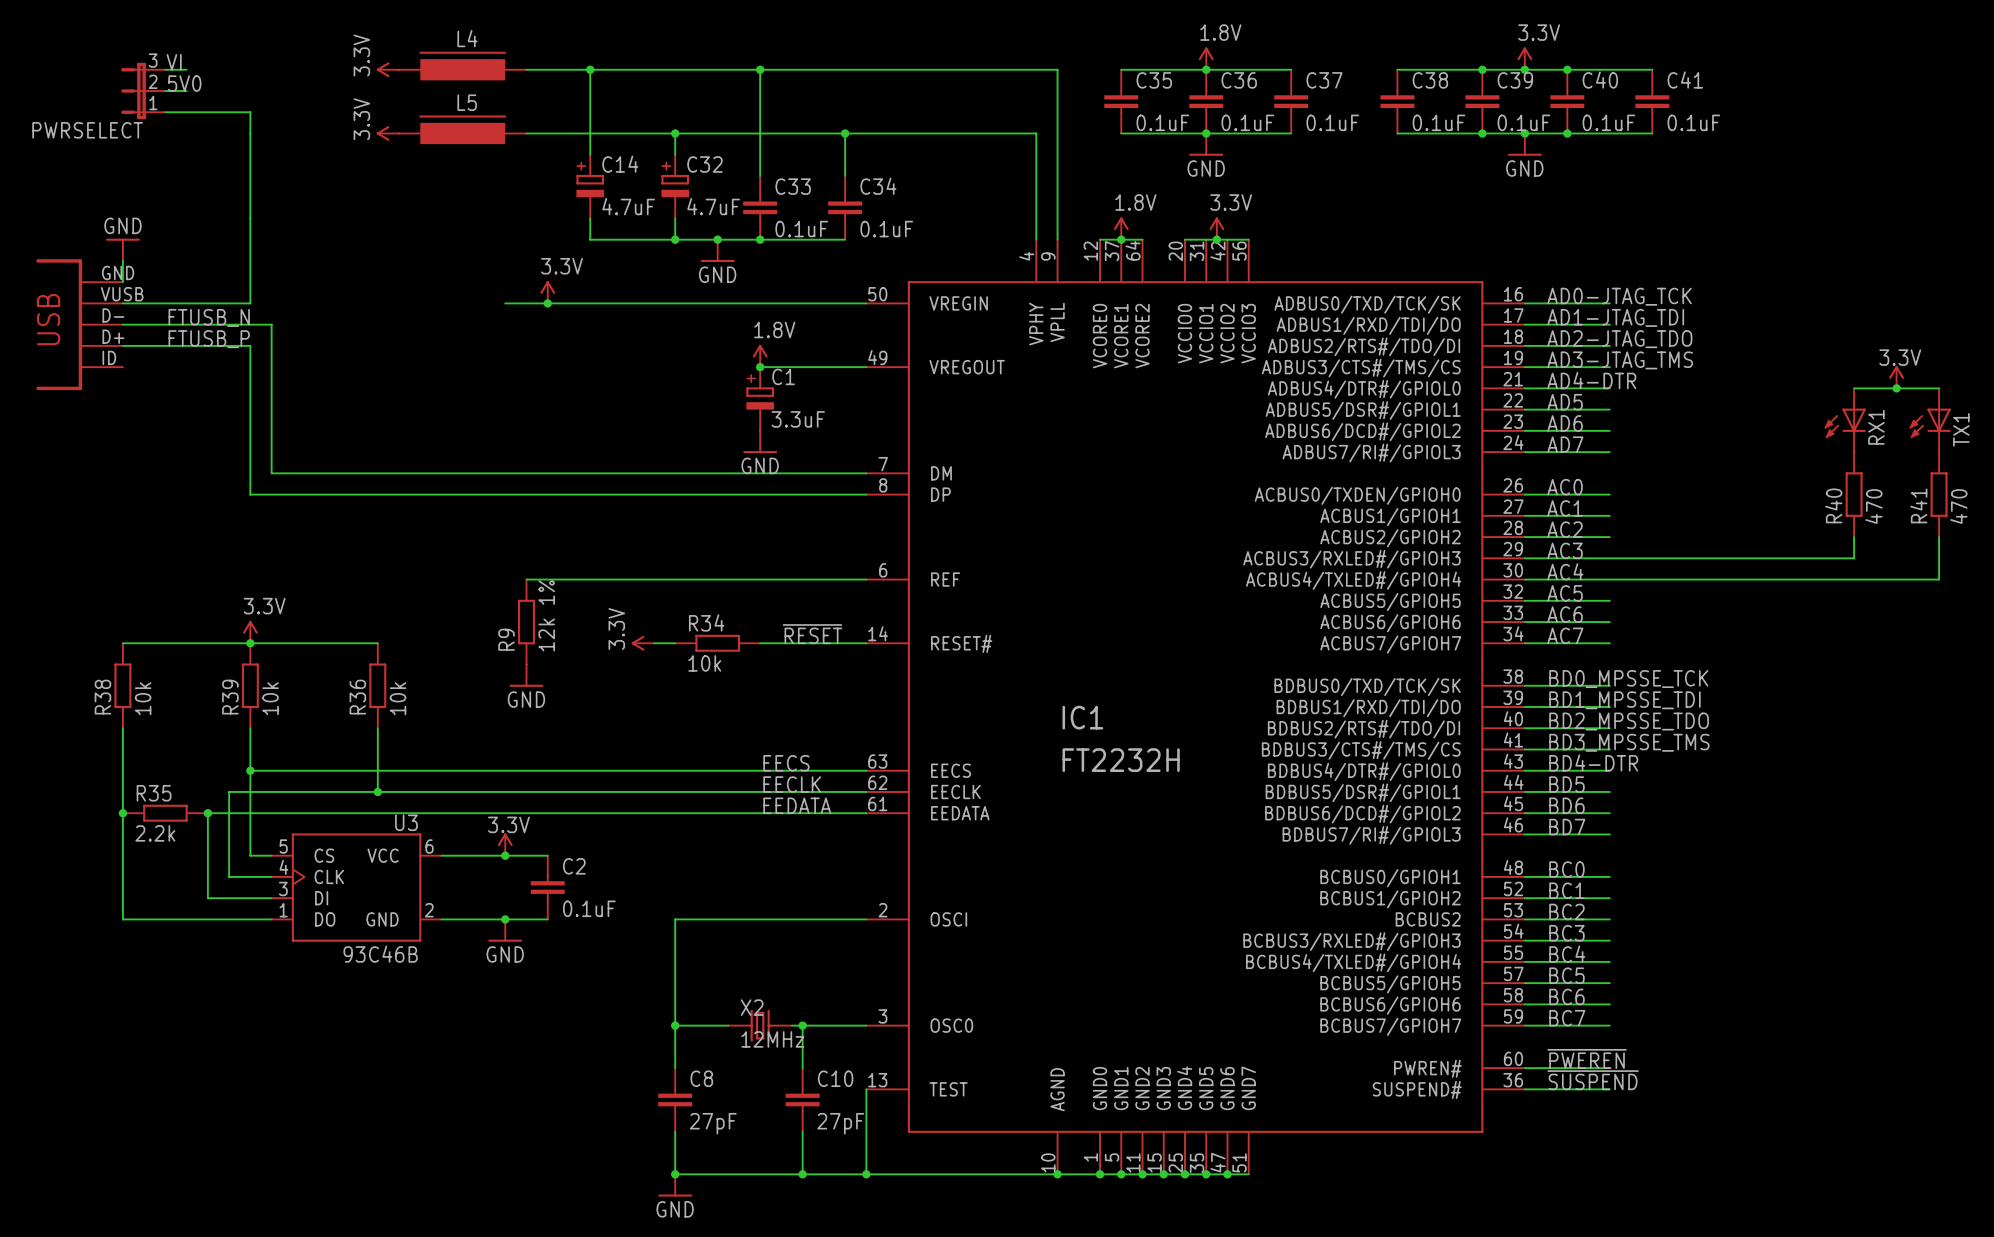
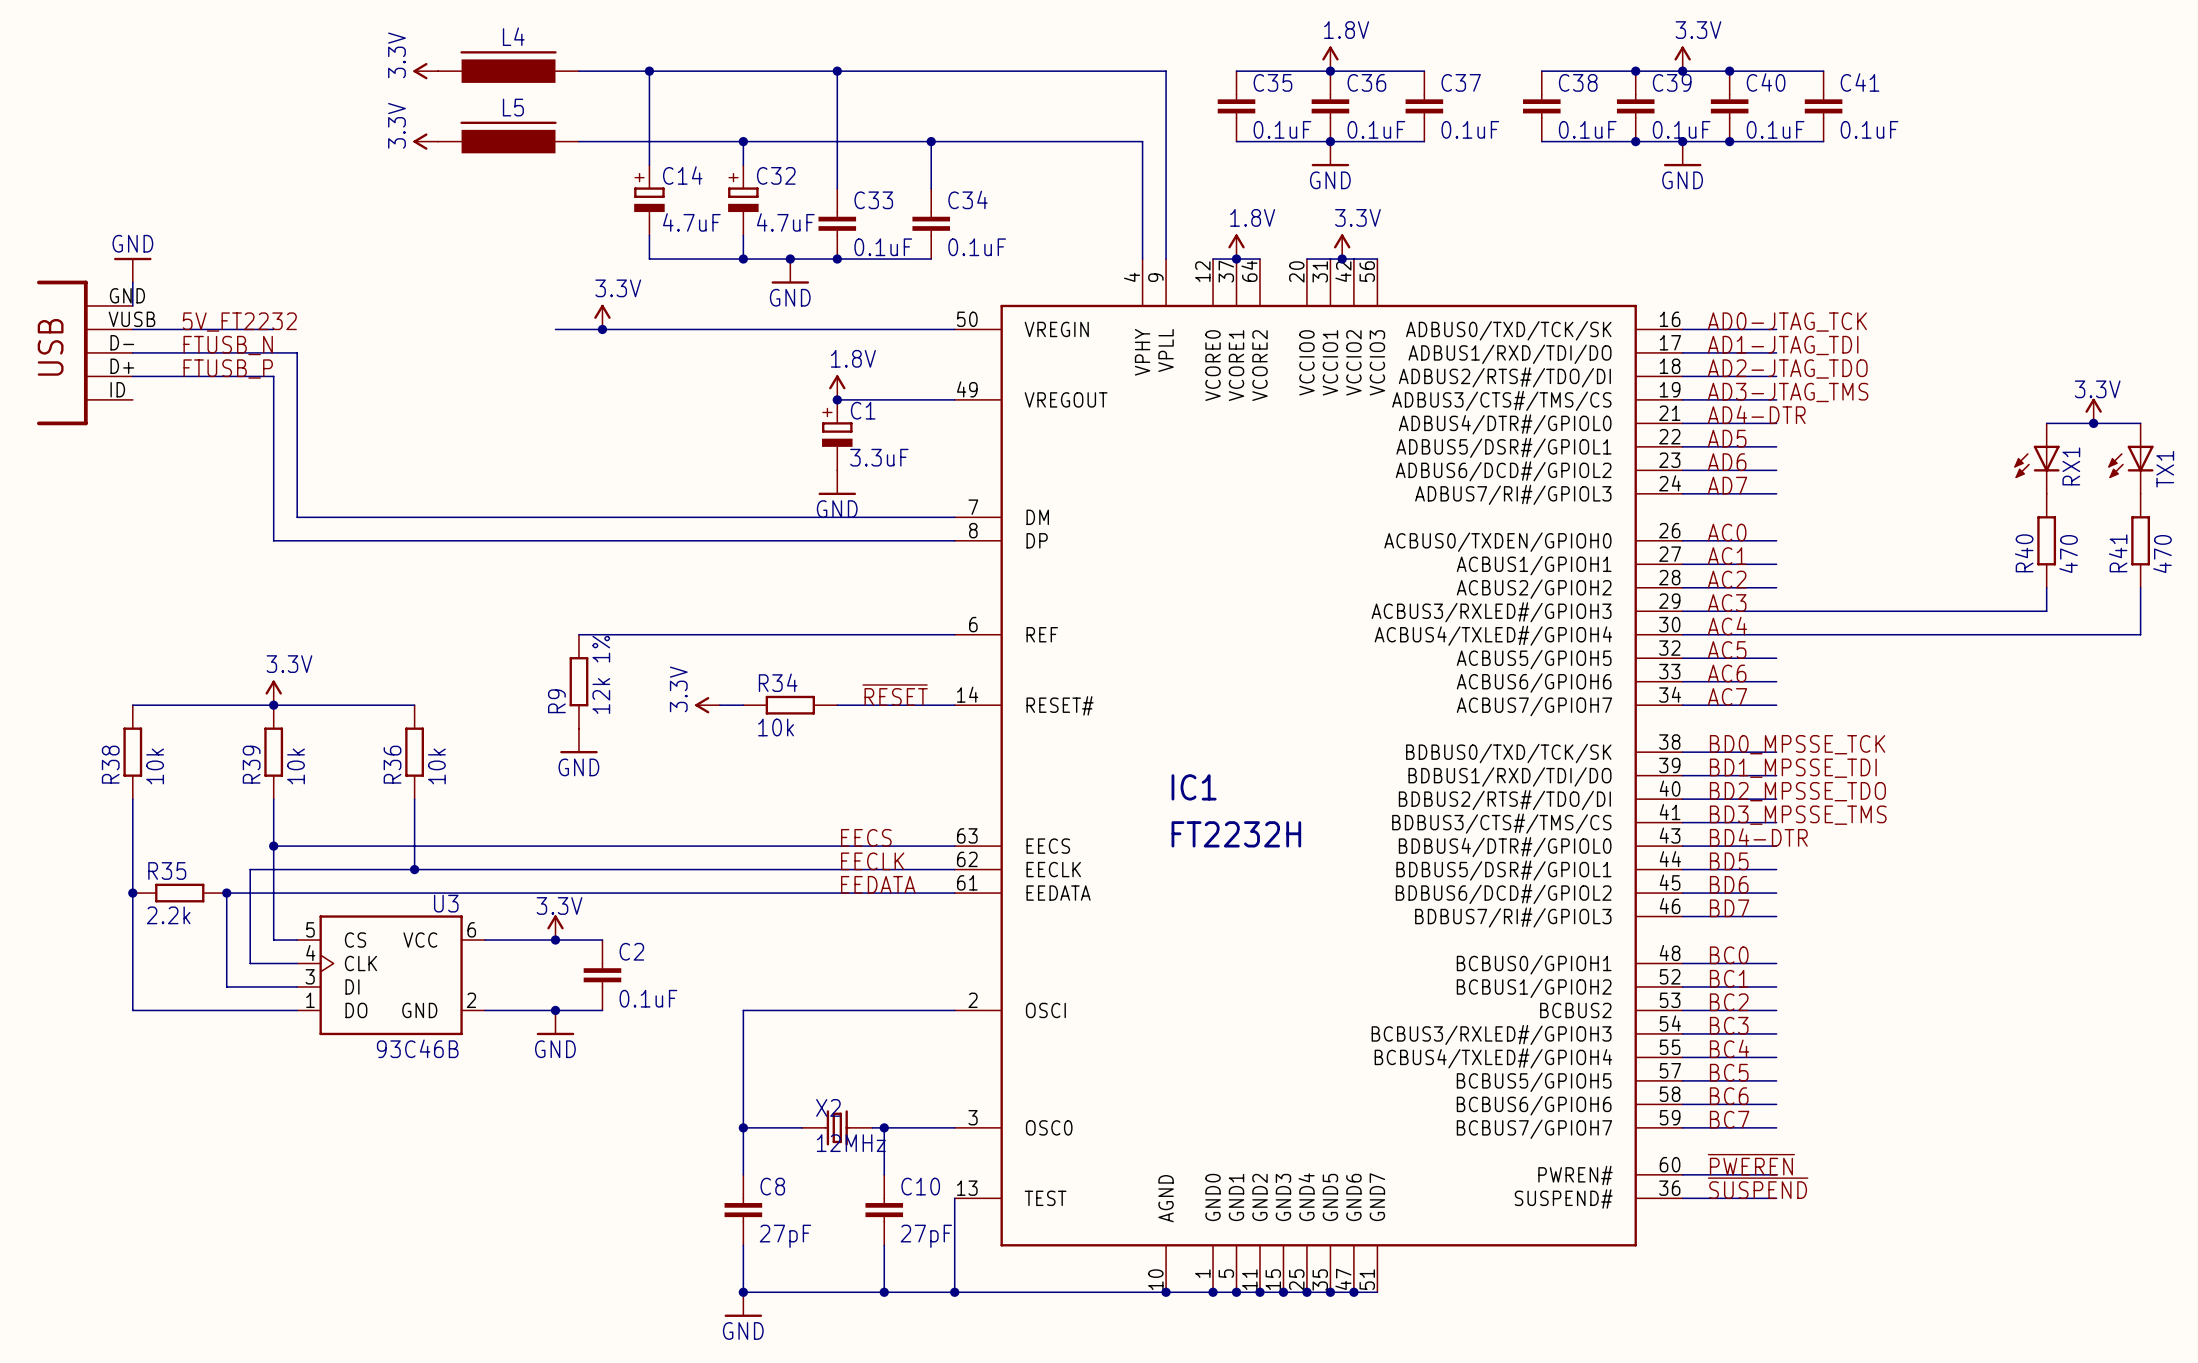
label: VI (174, 62) -> none
wire: (165, 69) (186, 69) -> none
label: 5V0 (184, 83) -> none
PWRSELECT: (143, 91) -> none
wire: (165, 91) (186, 91) -> none
wire: (165, 112) (250, 112) (250, 303) -> none
label: none -> 5V_FT2232 (239, 322)

